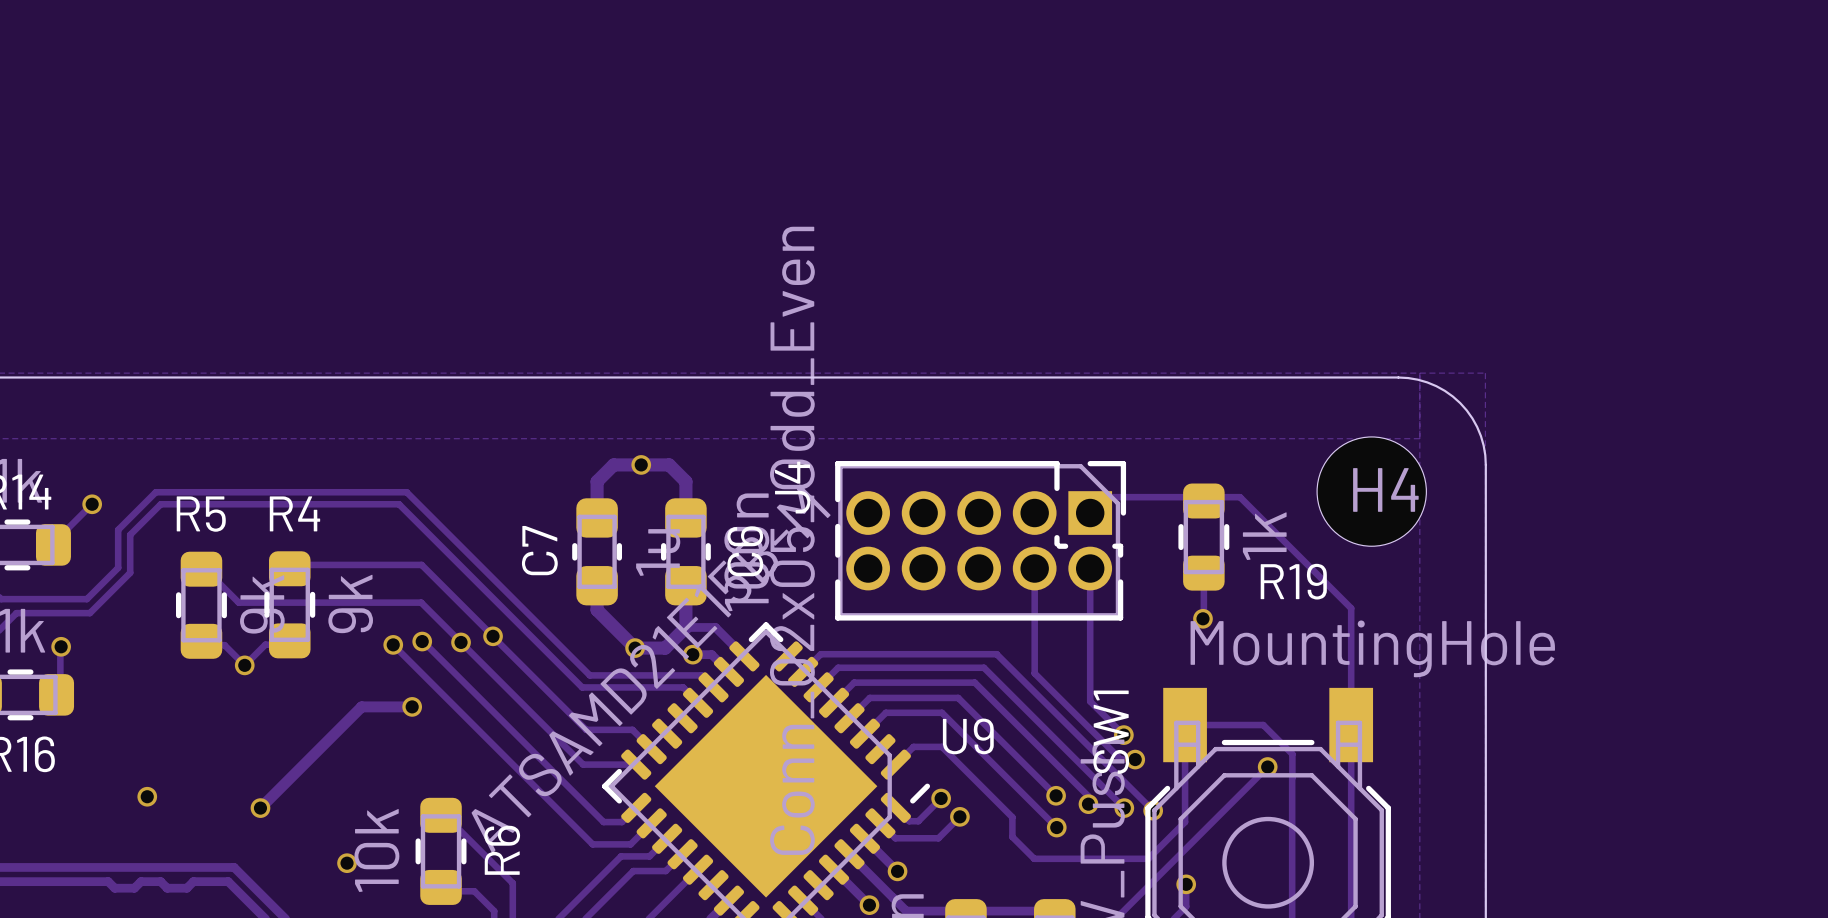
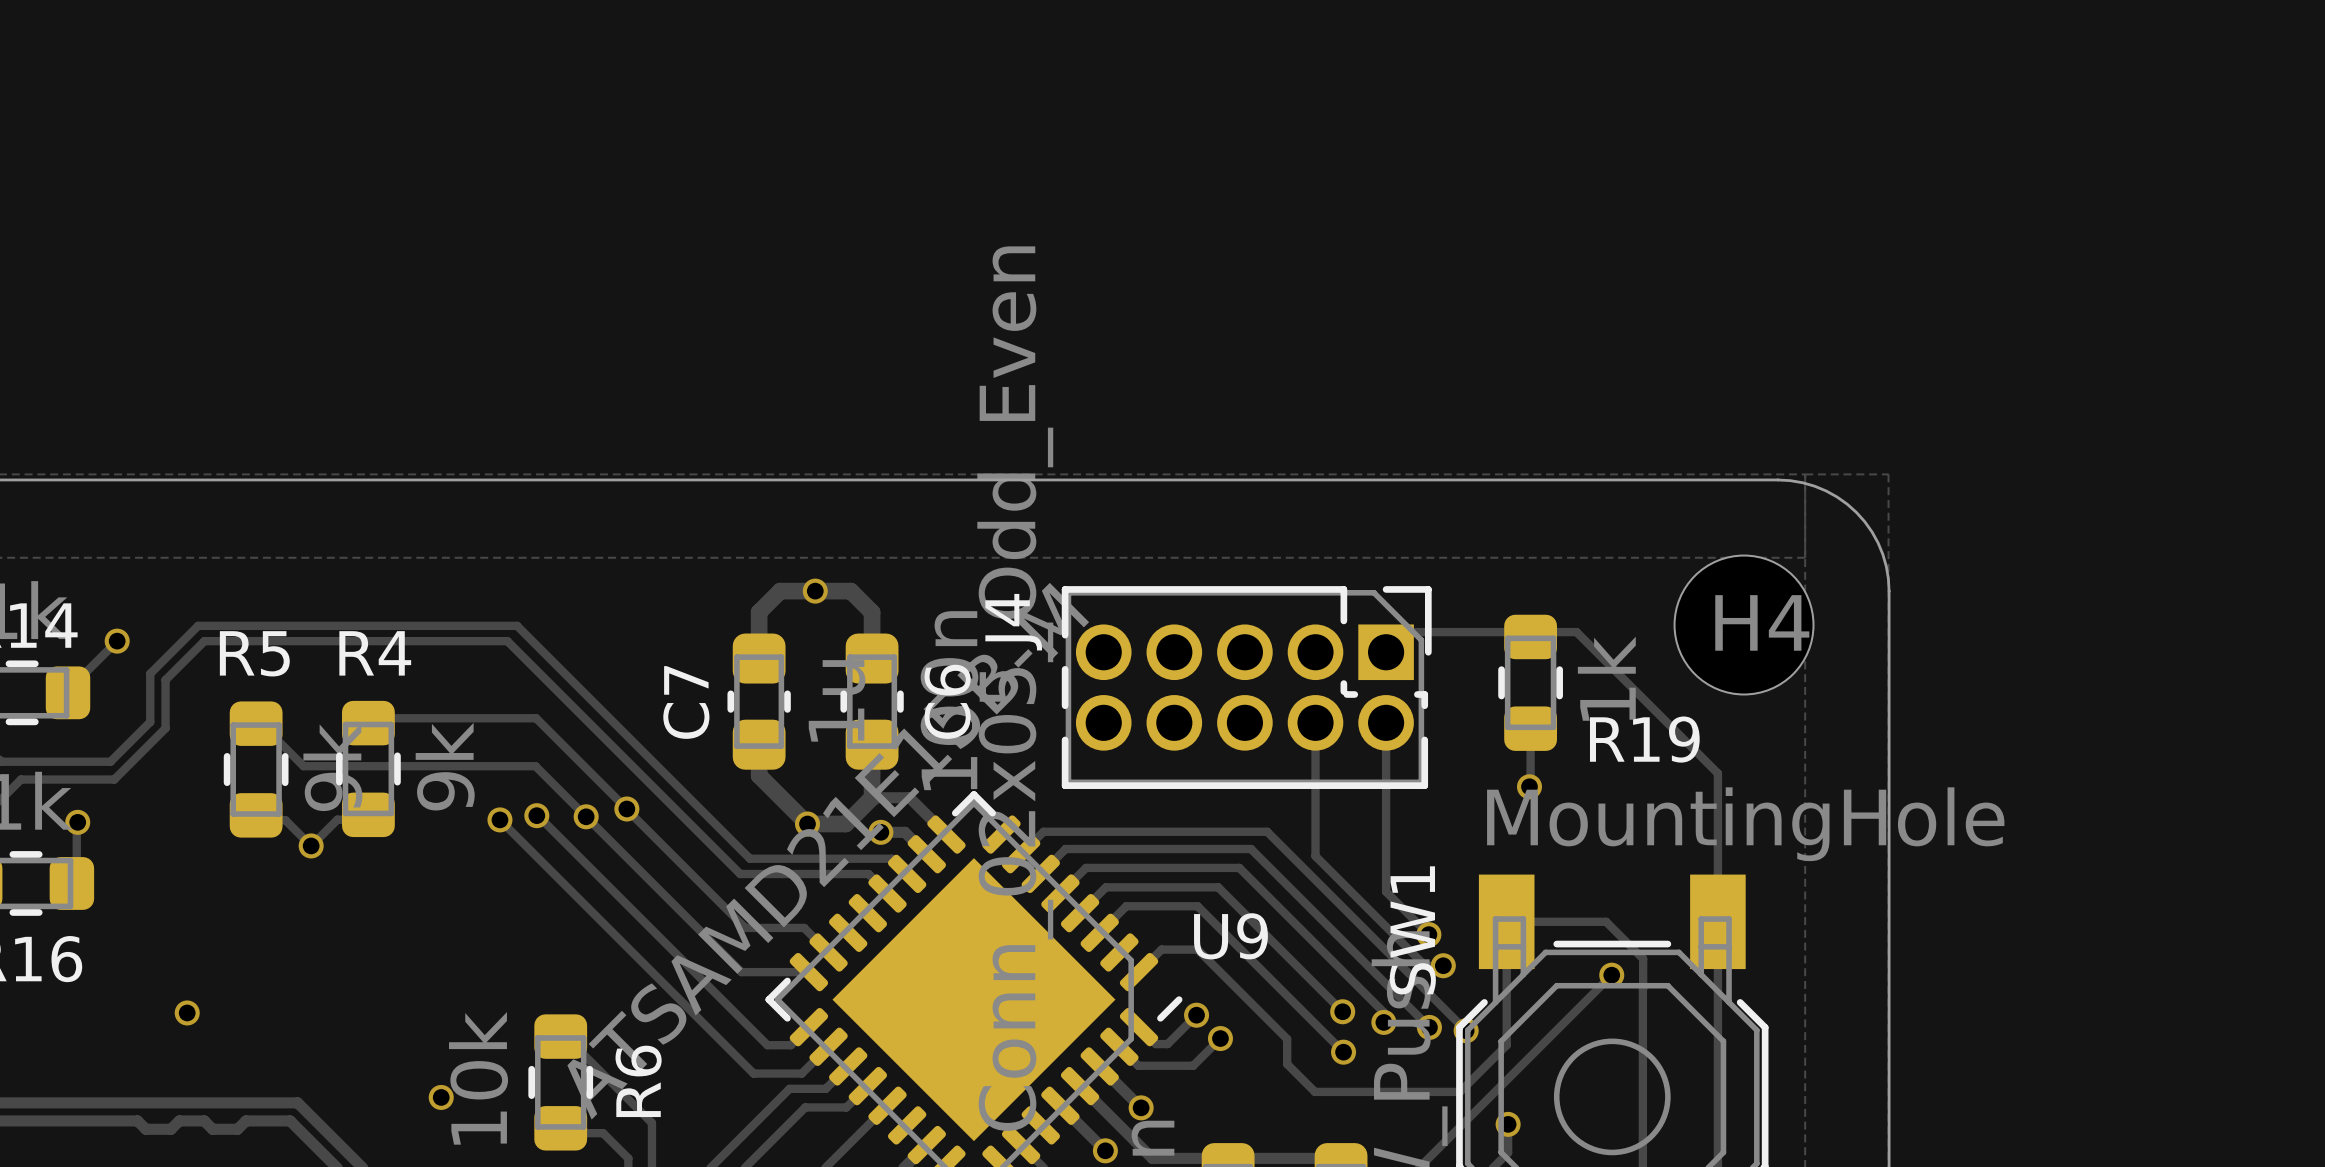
track: (412, 706) (361, 706) (260, 808) -> none
via: (412, 706) -> none
via: (260, 808) -> none

